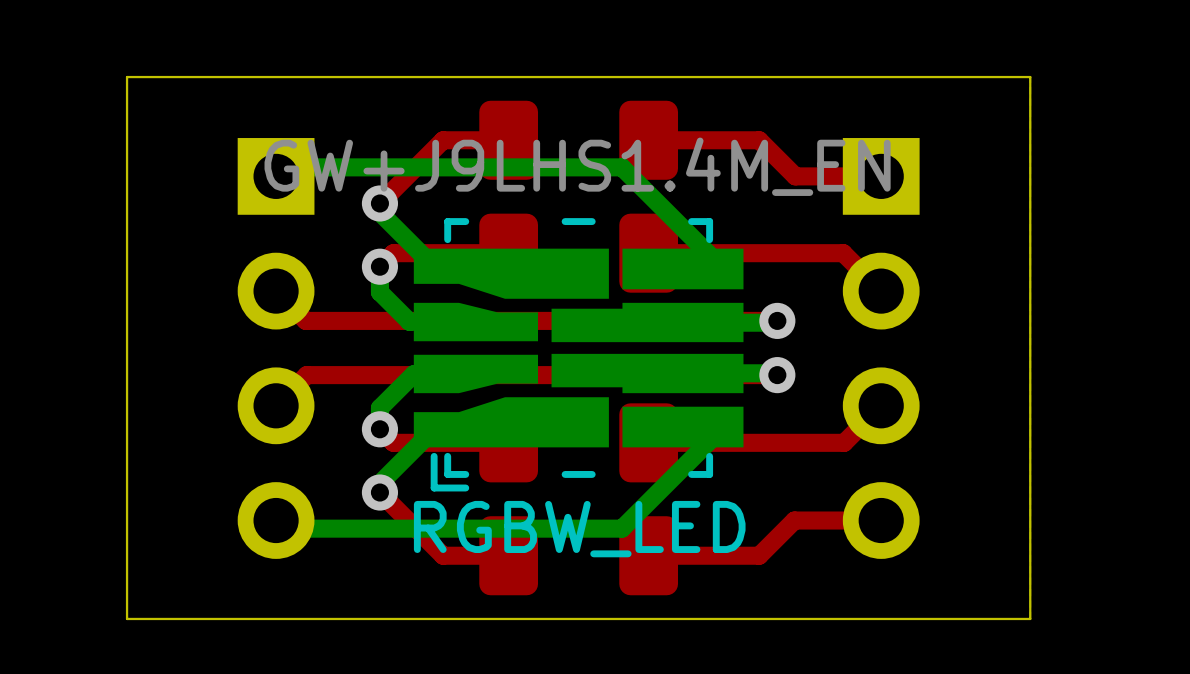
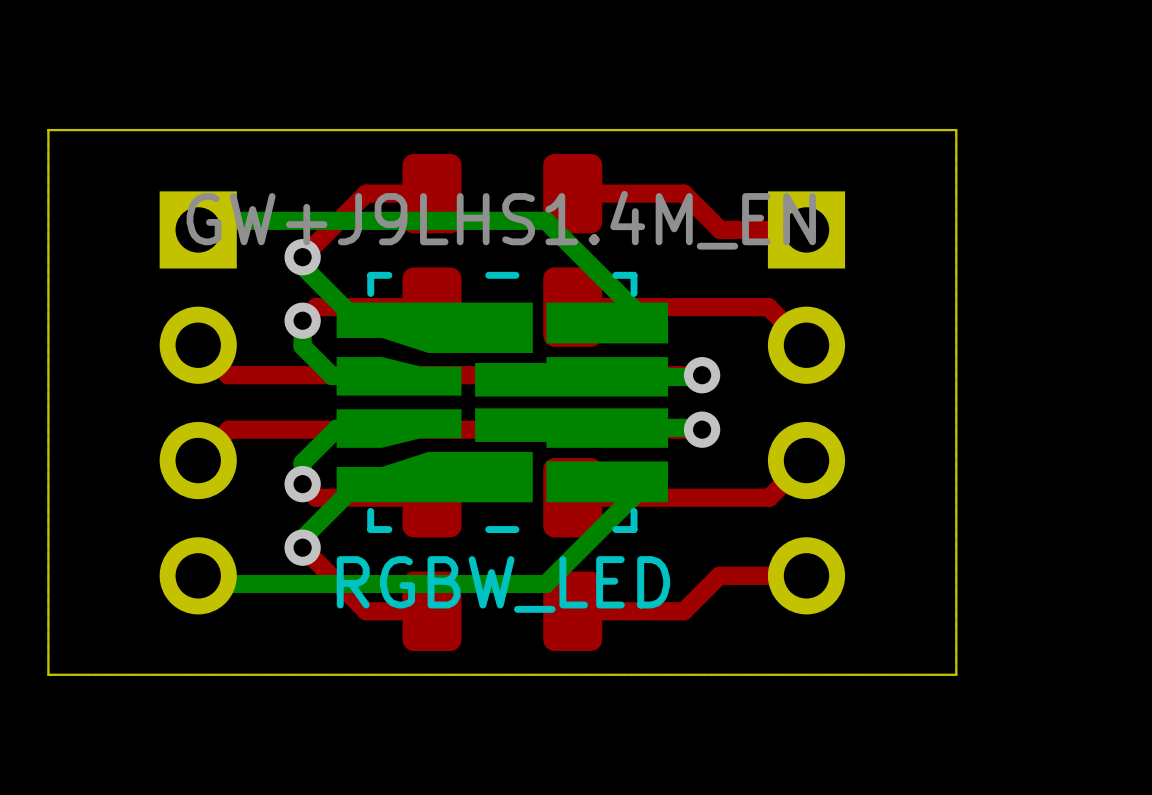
RGBW_LED footprint: [413, 218, 744, 492] -> [336, 271, 669, 534]

